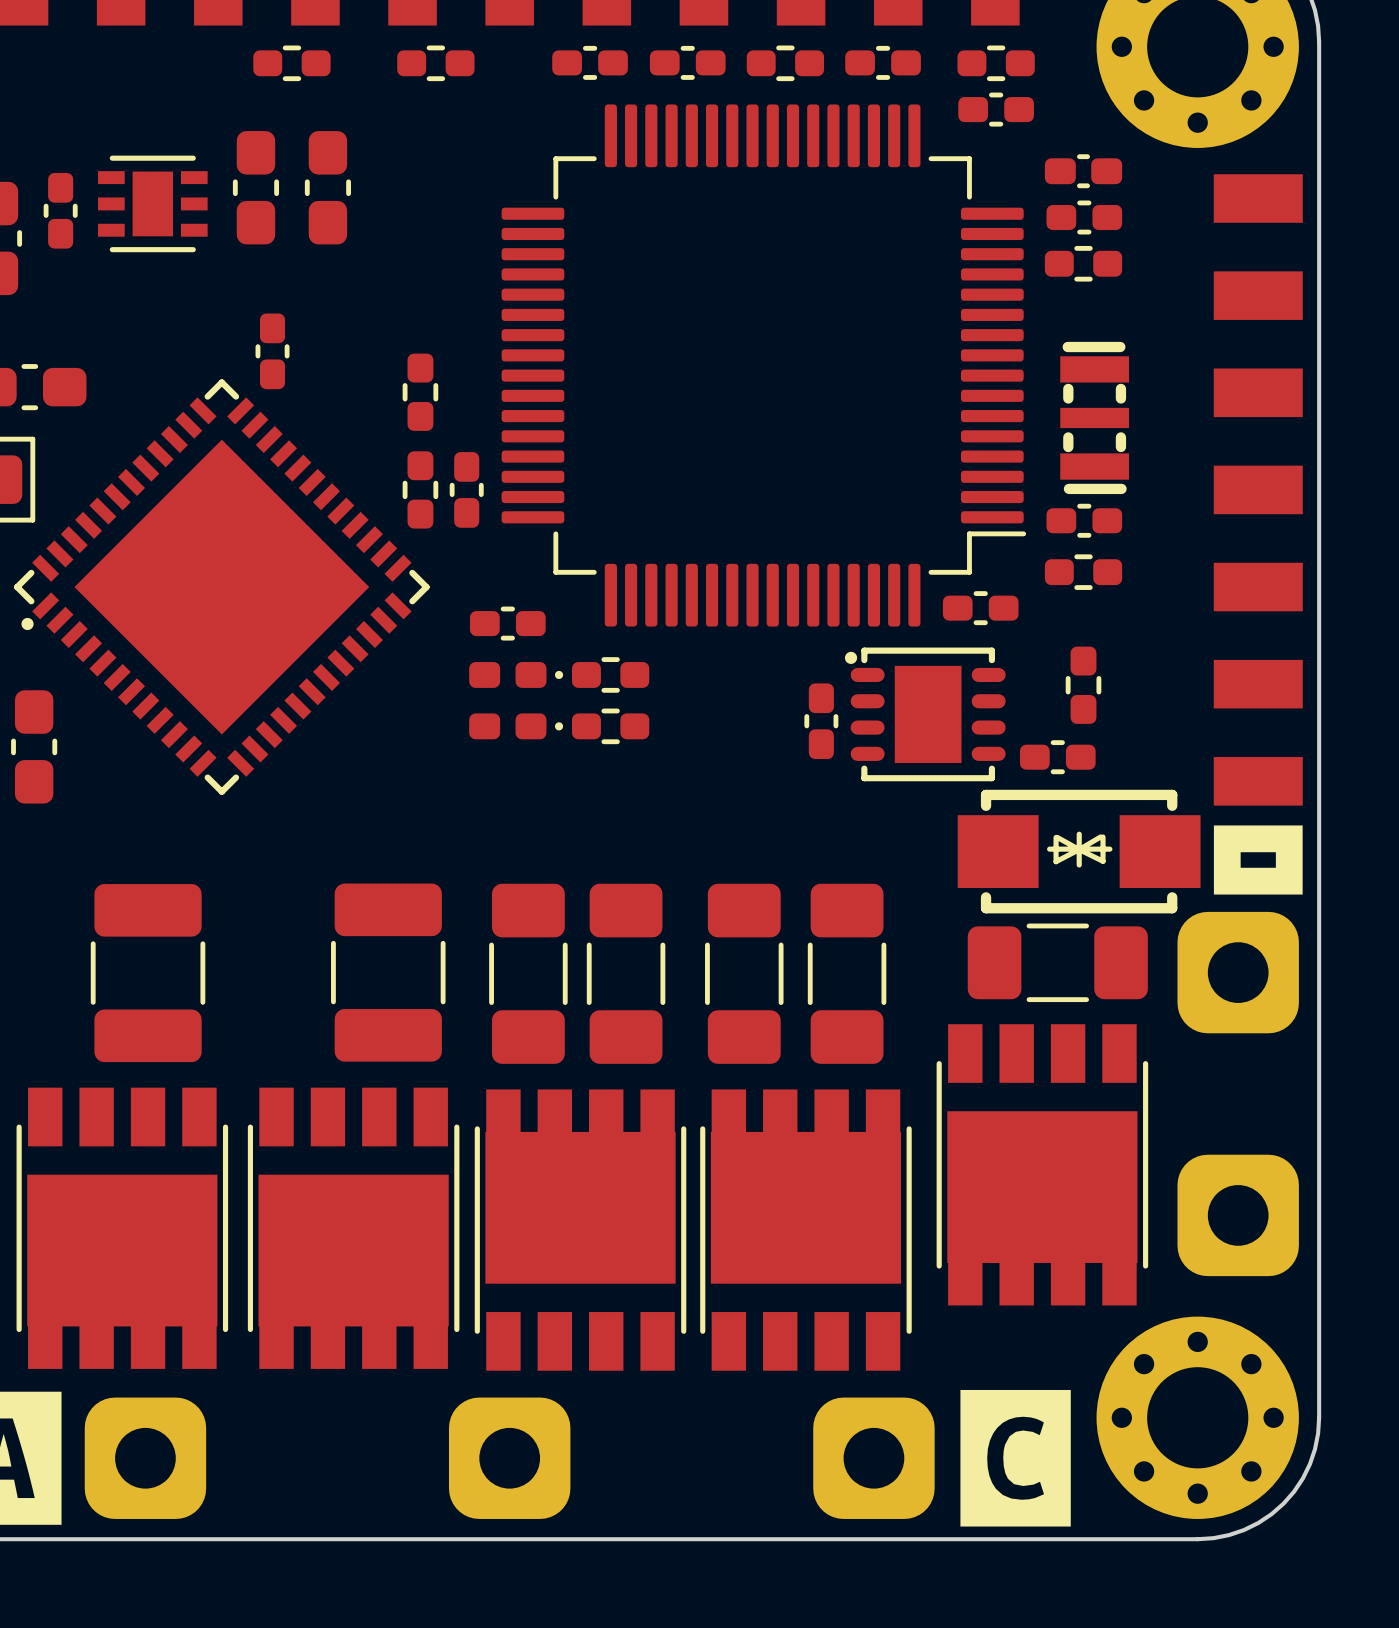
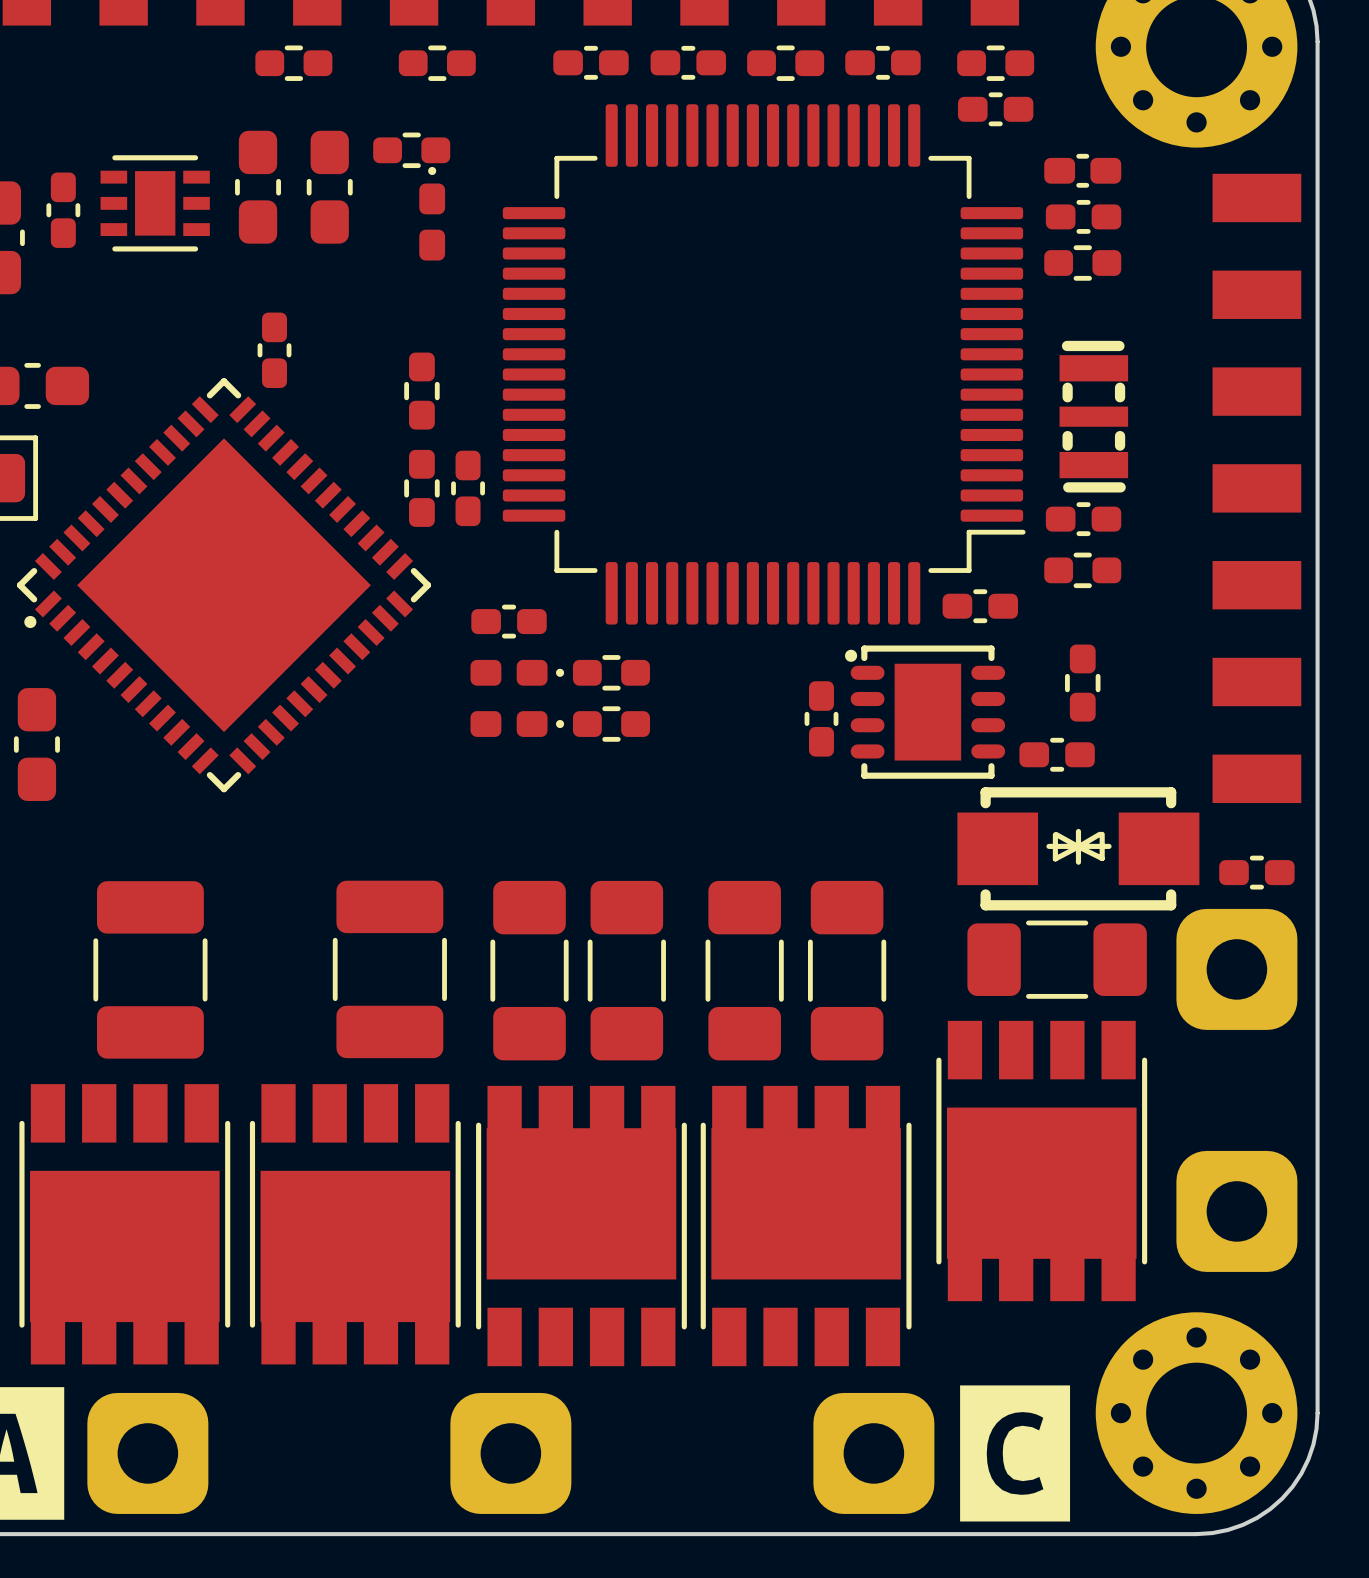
part: none -> (411, 150)
part: none -> (432, 213)
drawing: [1213, 825, 1303, 895] -> none
part: none -> (1256, 872)

